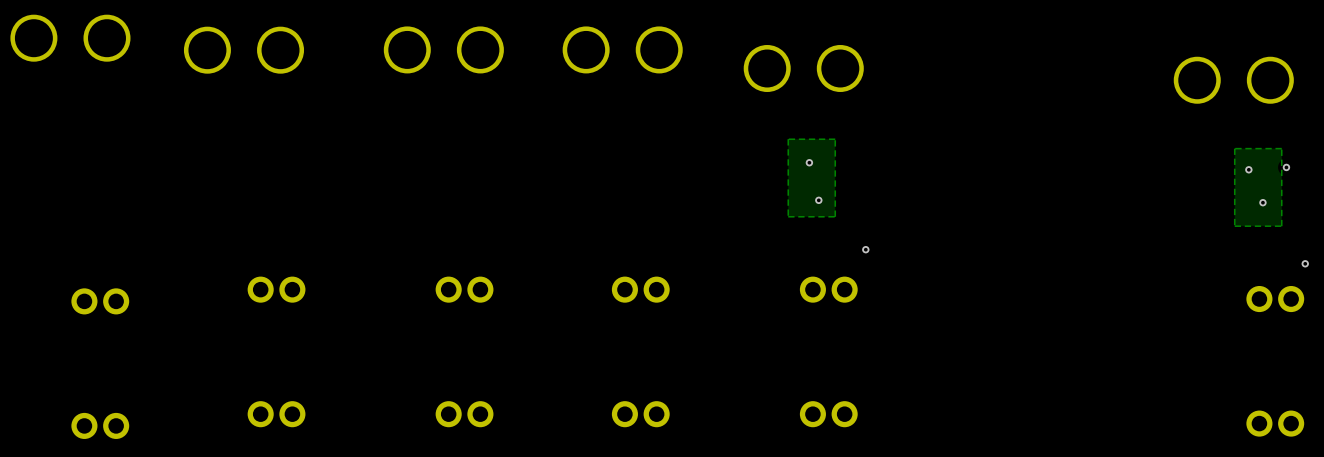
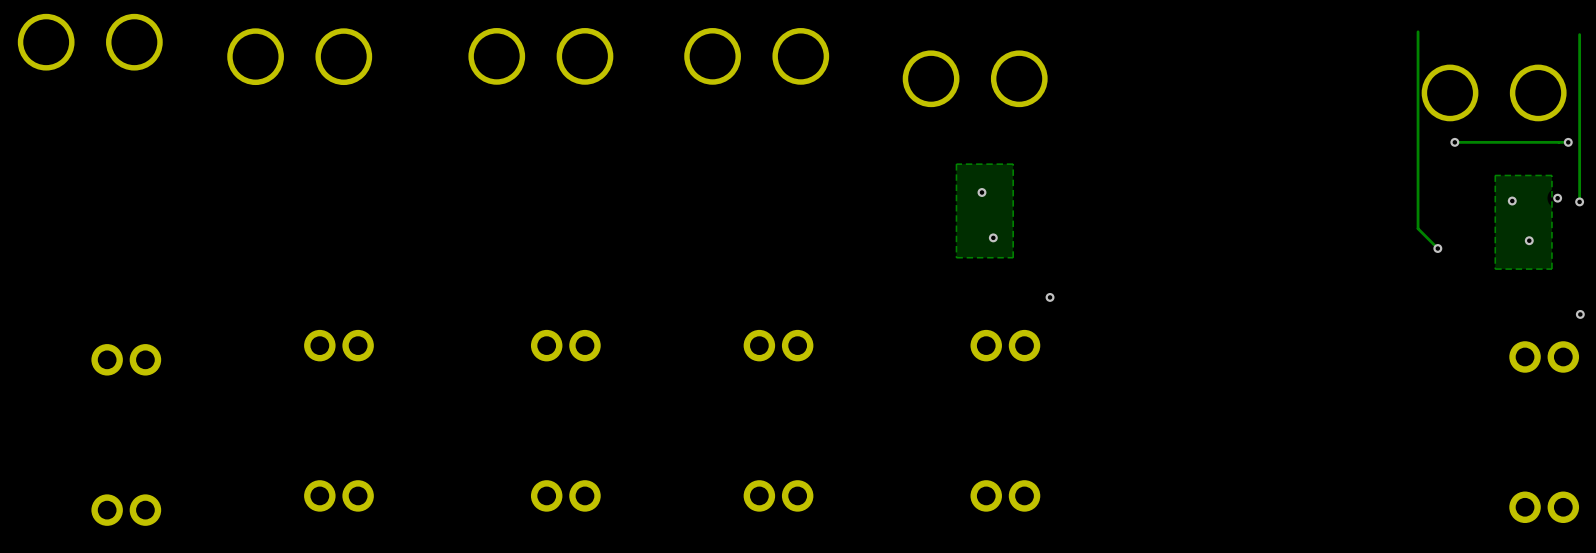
track: none -> (1418, 31) (1418, 228) (1437, 248)
track: none -> (1579, 34) (1579, 201)
via: none -> (1454, 142)
track: none -> (1568, 142) (1454, 142)
via: none -> (1568, 142)
via: none -> (1579, 201)
via: none -> (1437, 248)

